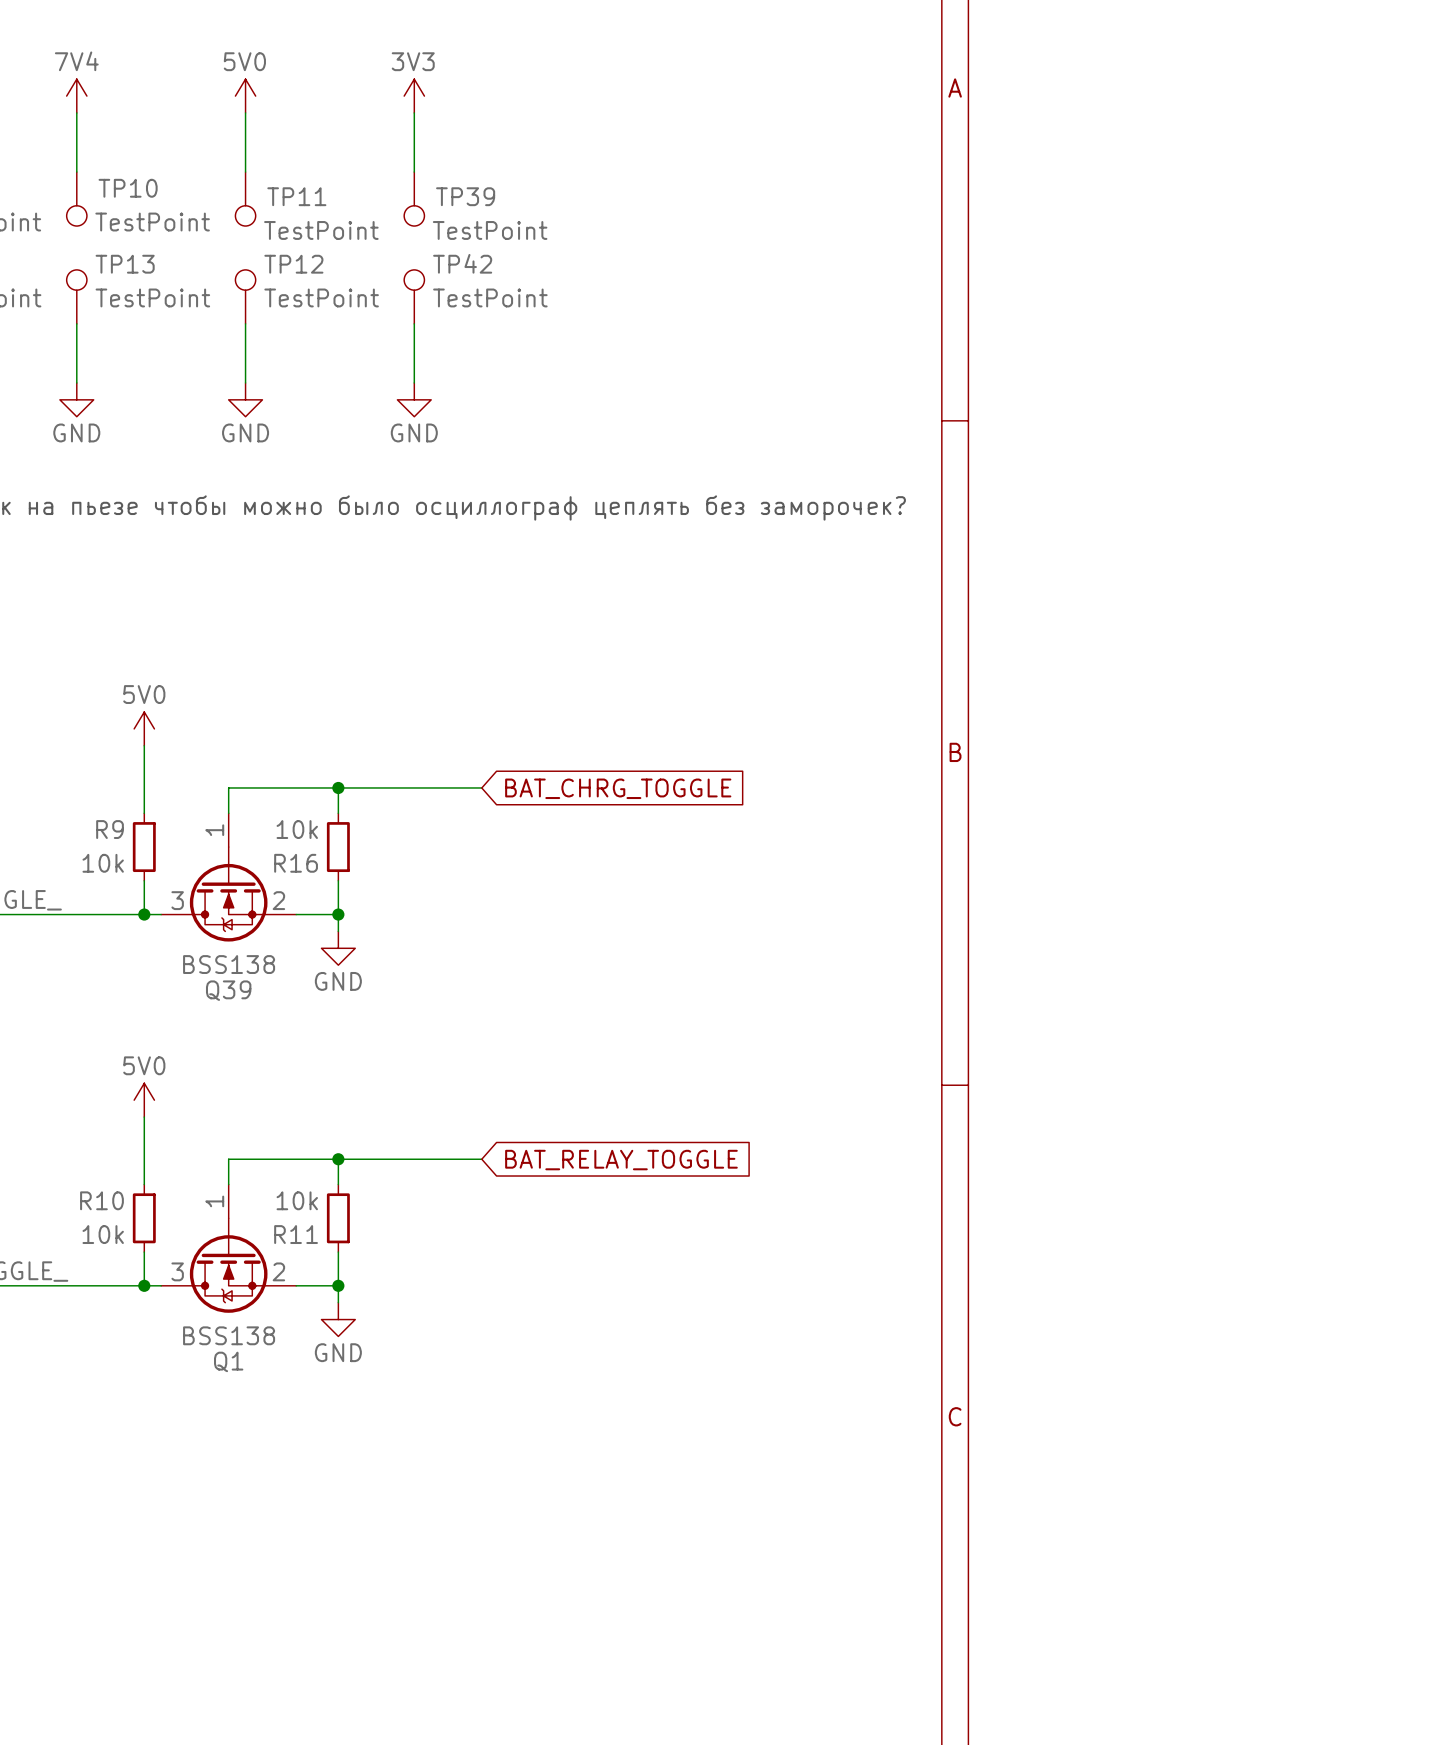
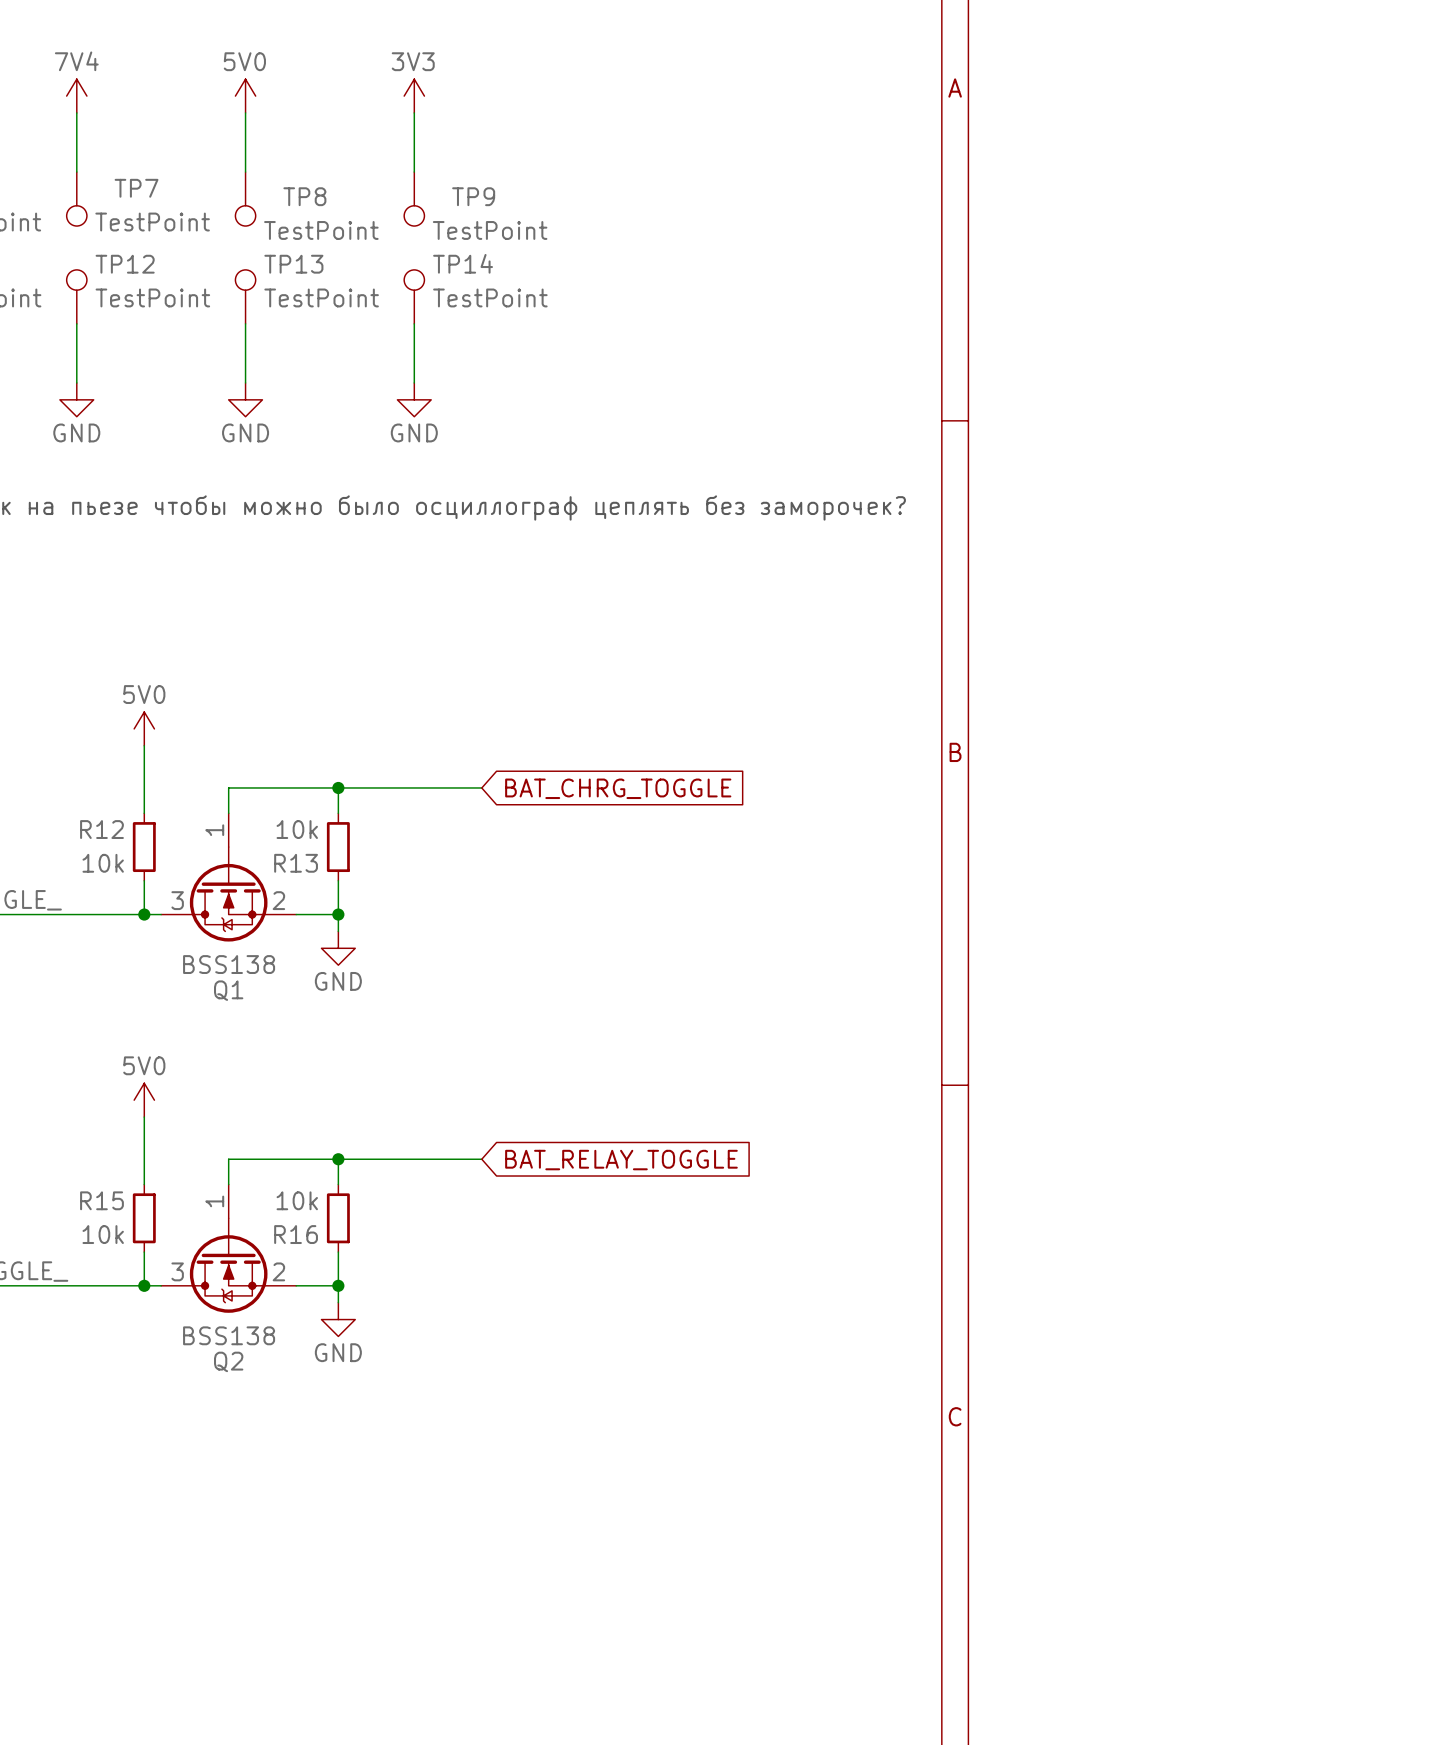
TP10 name: TP10 (128, 188) -> TP7 (136, 188)
TP11 name: TP11 (296, 196) -> TP8 (304, 196)
TP39 name: TP39 (465, 196) -> TP9 (473, 196)
TP42 name: TP42 (462, 263) -> TP14 (463, 263)
TP13 name: TP13 (125, 264) -> TP12 (125, 264)
TP12 name: TP12 (293, 264) -> TP13 (293, 264)
R9 name: R9 (110, 829) -> R12 (101, 829)
R16 name: R16 (296, 863) -> R13 (296, 863)
Q39 name: Q39 (228, 990) -> Q1 (228, 990)
R10 name: R10 (101, 1200) -> R15 (101, 1200)
R11 name: R11 (296, 1234) -> R16 (296, 1234)
Q1 name: Q1 (228, 1361) -> Q2 (228, 1361)

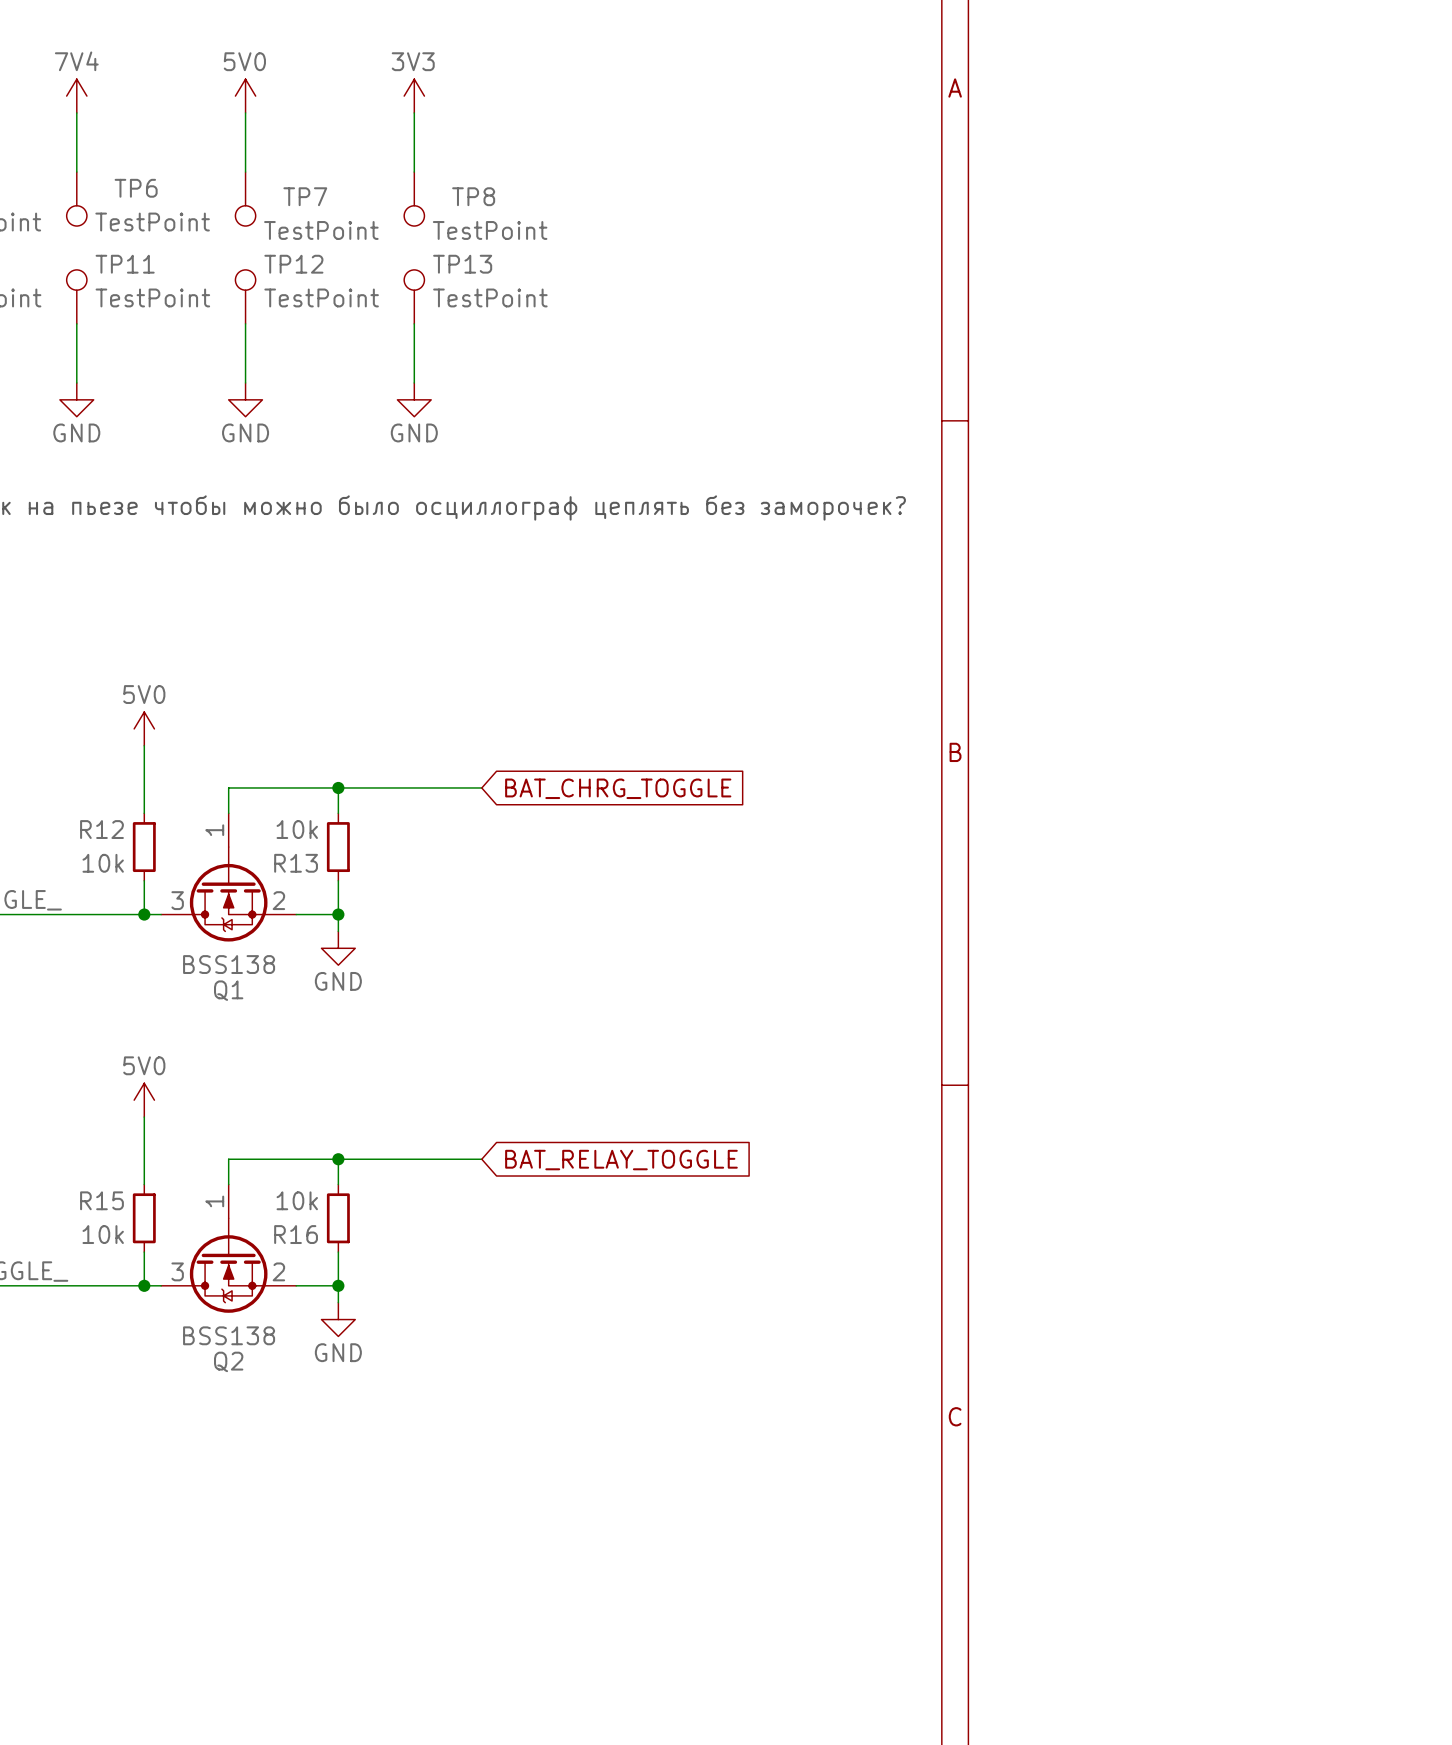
TP7 name: TP7 (136, 188) -> TP6 (136, 188)
TP8 name: TP8 (304, 196) -> TP7 (305, 196)
TP9 name: TP9 (473, 196) -> TP8 (473, 196)
TP14 name: TP14 (463, 263) -> TP13 (462, 264)
TP12 name: TP12 (125, 264) -> TP11 (125, 264)
TP13 name: TP13 (293, 264) -> TP12 (293, 264)

